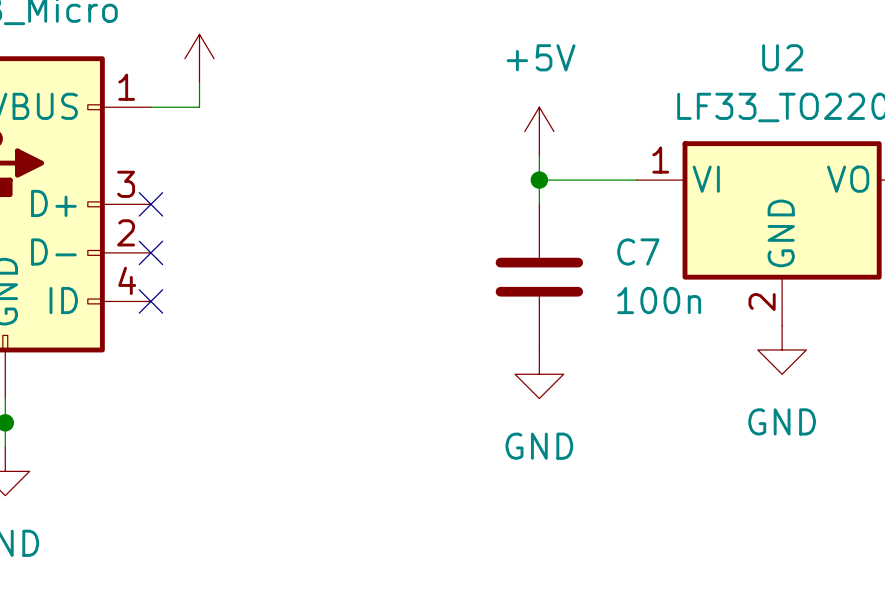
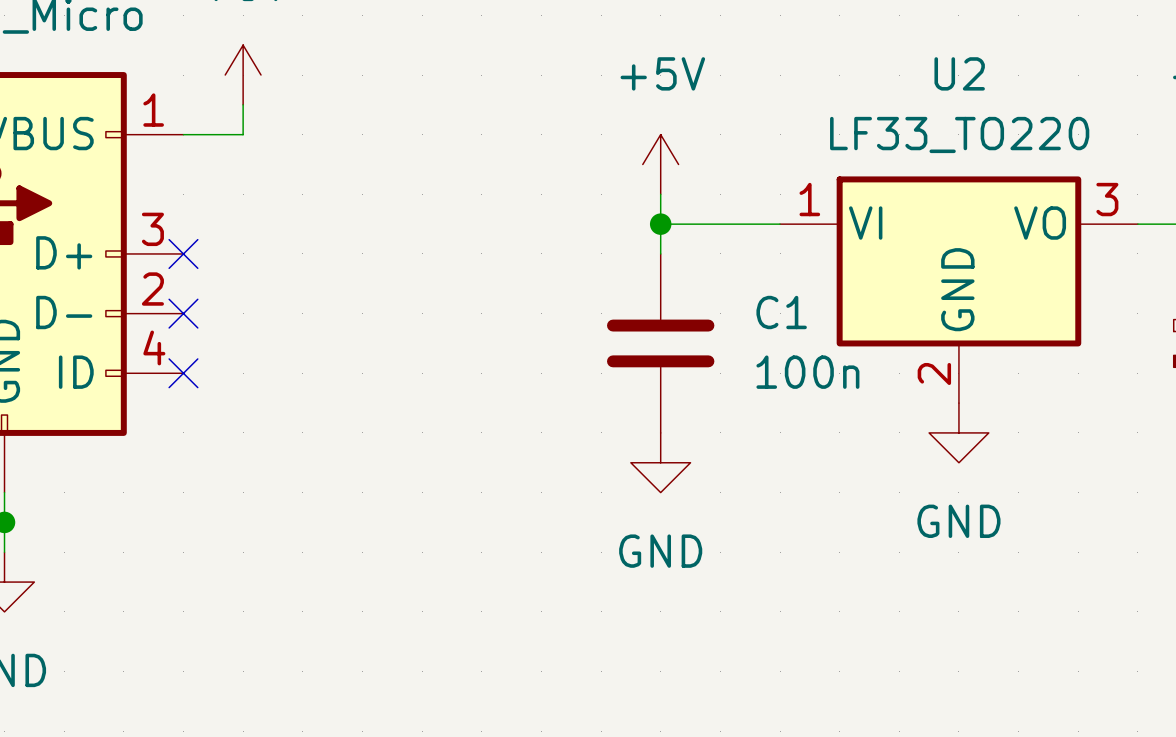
C7 name: C7 (638, 251) -> C1 (781, 312)

